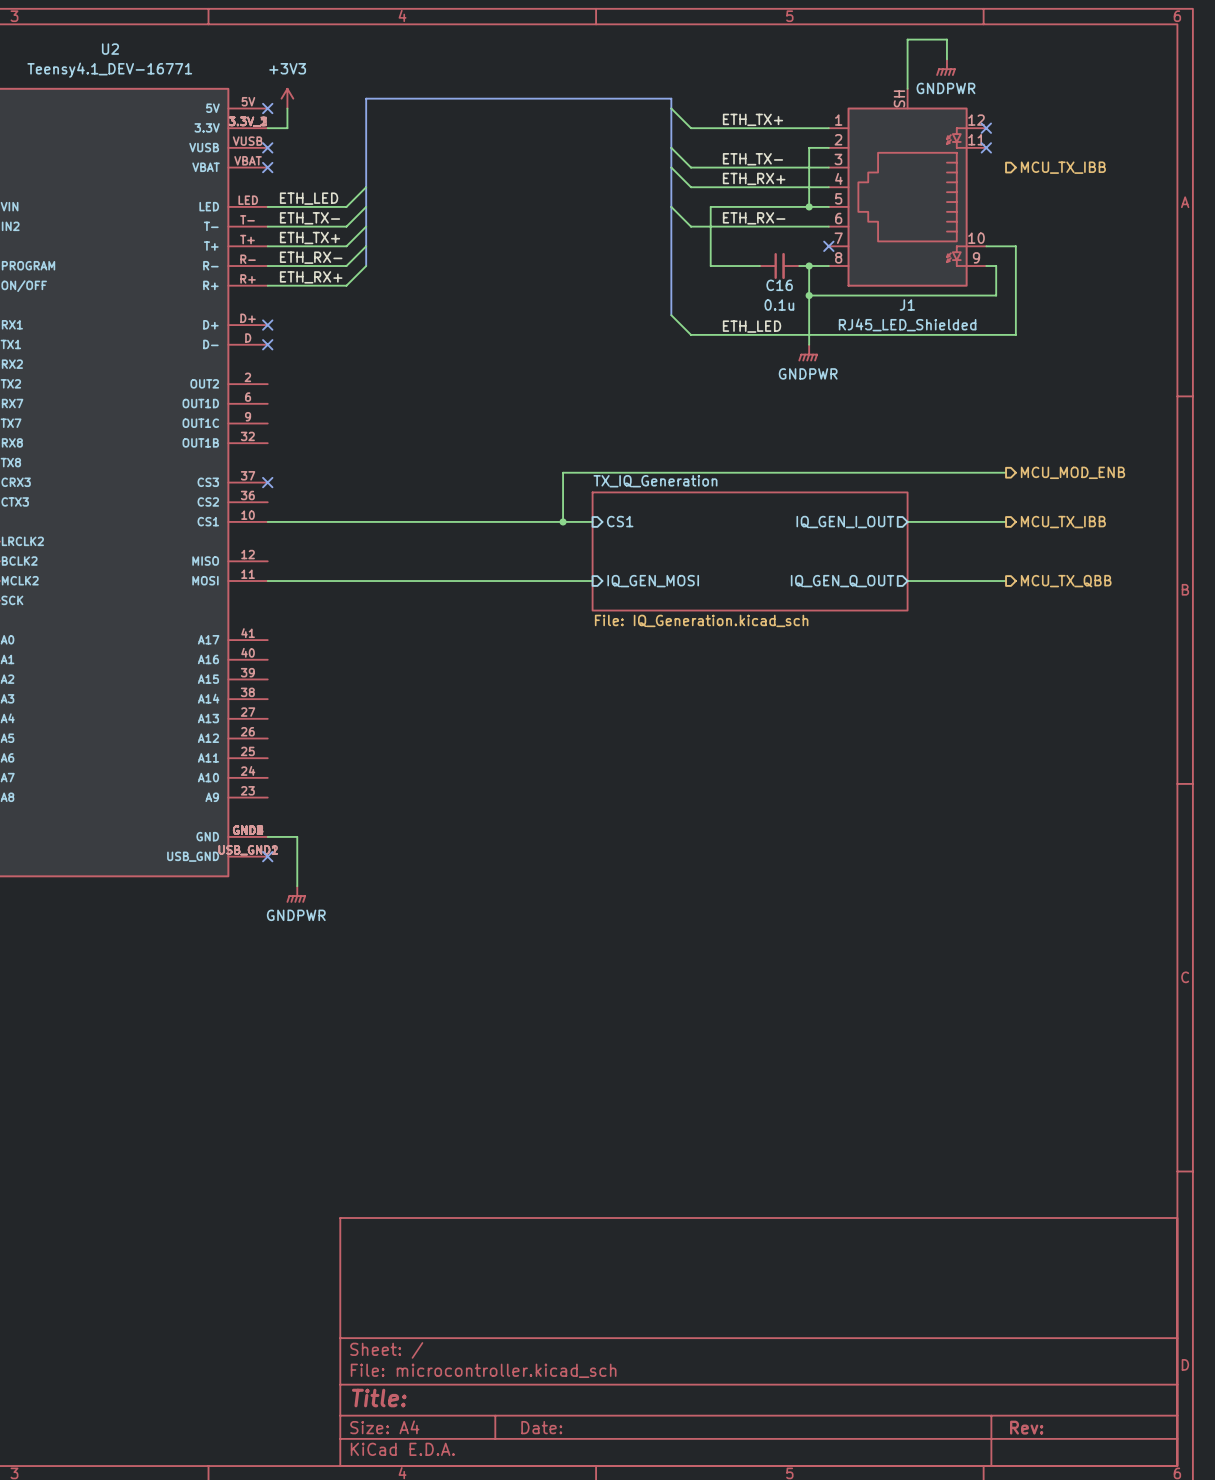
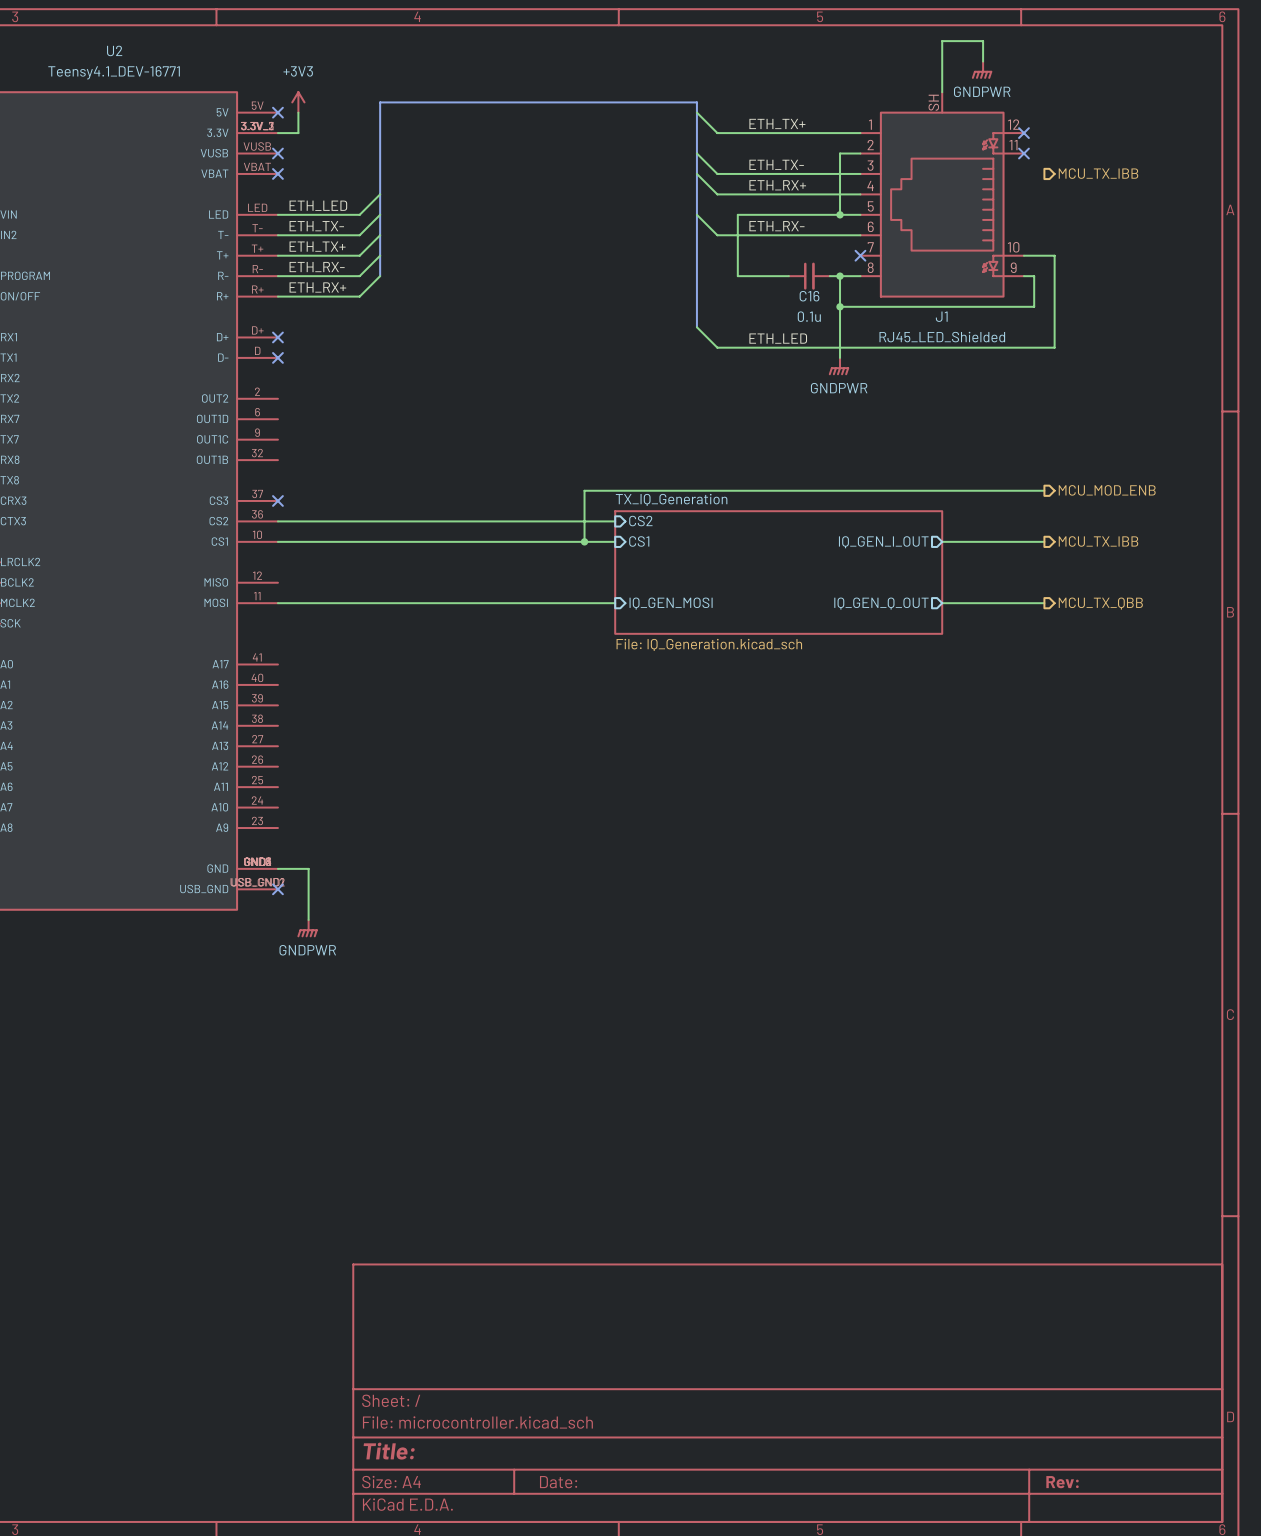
sheet pin: none -> CS2 (640, 521)
wire: none -> (277, 521) (615, 521)

